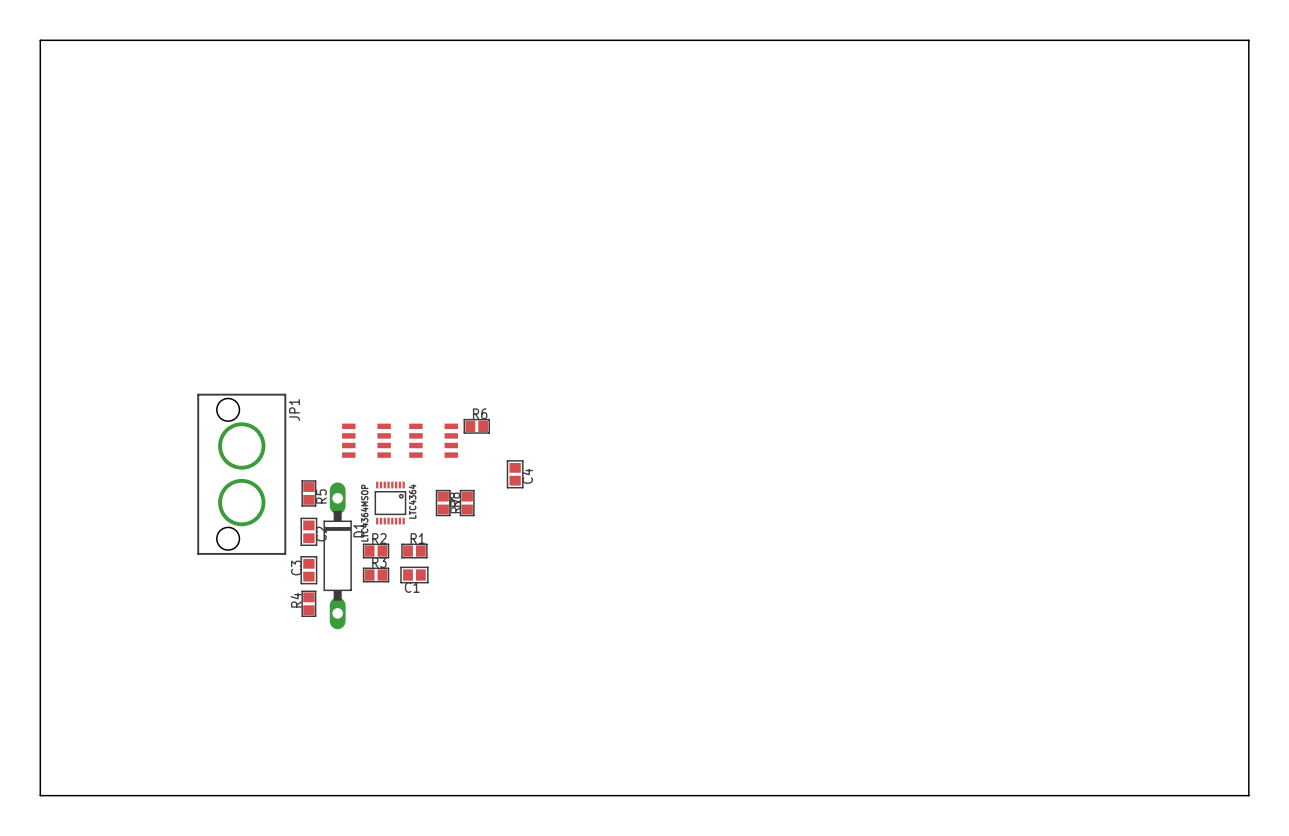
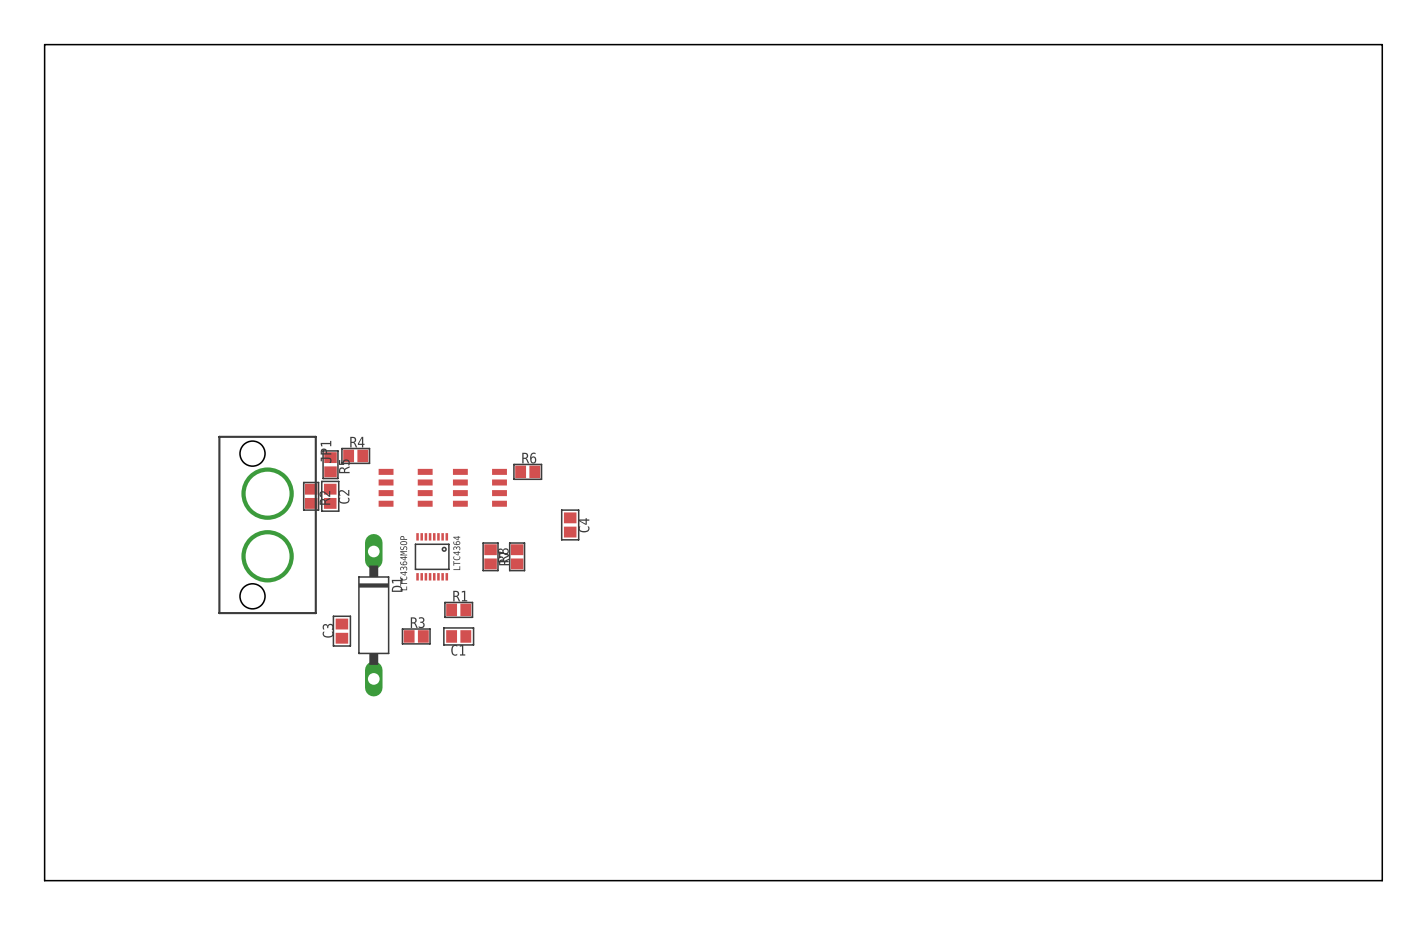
R5 position: (308, 493) -> (330, 464)
C2 position: (308, 531) -> (330, 496)
R2 rotation: 0° (376, 551) -> 90° clockwise (311, 496)
R2 position: (376, 551) -> (311, 496)
R4 rotation: 0° (308, 603) -> 90° clockwise (355, 455)
R4 position: (308, 603) -> (355, 455)

